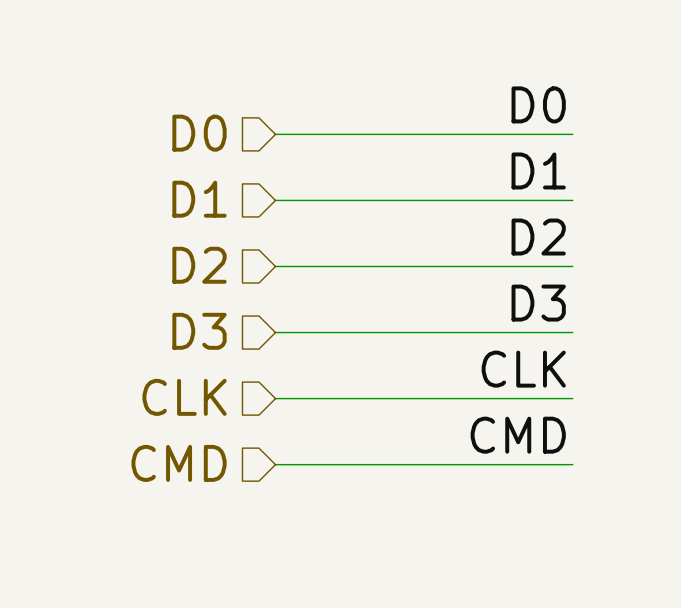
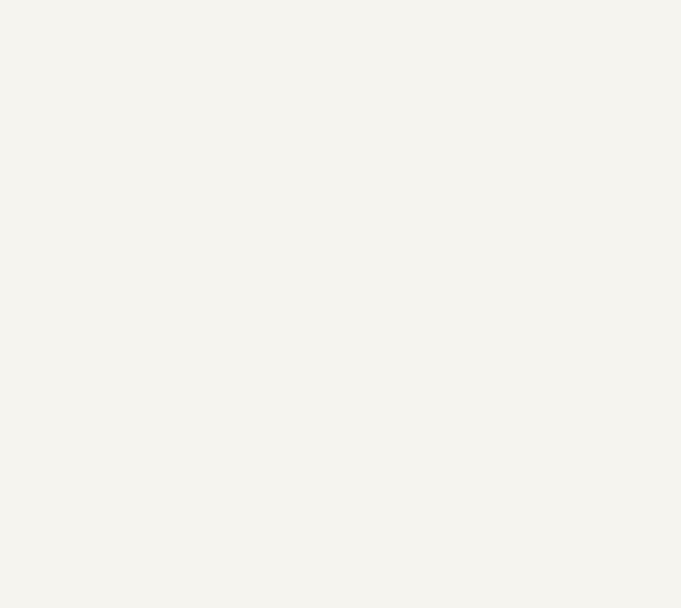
label: D0 (538, 104) -> none
hierarchical label: D0 (199, 133) -> none
wire: (275, 134) (572, 134) -> none
label: D1 (538, 170) -> none
hierarchical label: D1 (199, 199) -> none
wire: (275, 200) (572, 200) -> none
label: D2 (538, 237) -> none
hierarchical label: D2 (199, 265) -> none
wire: (275, 266) (572, 266) -> none
label: D3 (538, 303) -> none
hierarchical label: D3 (199, 331) -> none
wire: (275, 332) (572, 332) -> none
label: CLK (523, 369) -> none
hierarchical label: CLK (184, 397) -> none
wire: (275, 398) (572, 398) -> none
label: CMD (518, 435) -> none
hierarchical label: CMD (179, 463) -> none
wire: (275, 464) (572, 464) -> none

